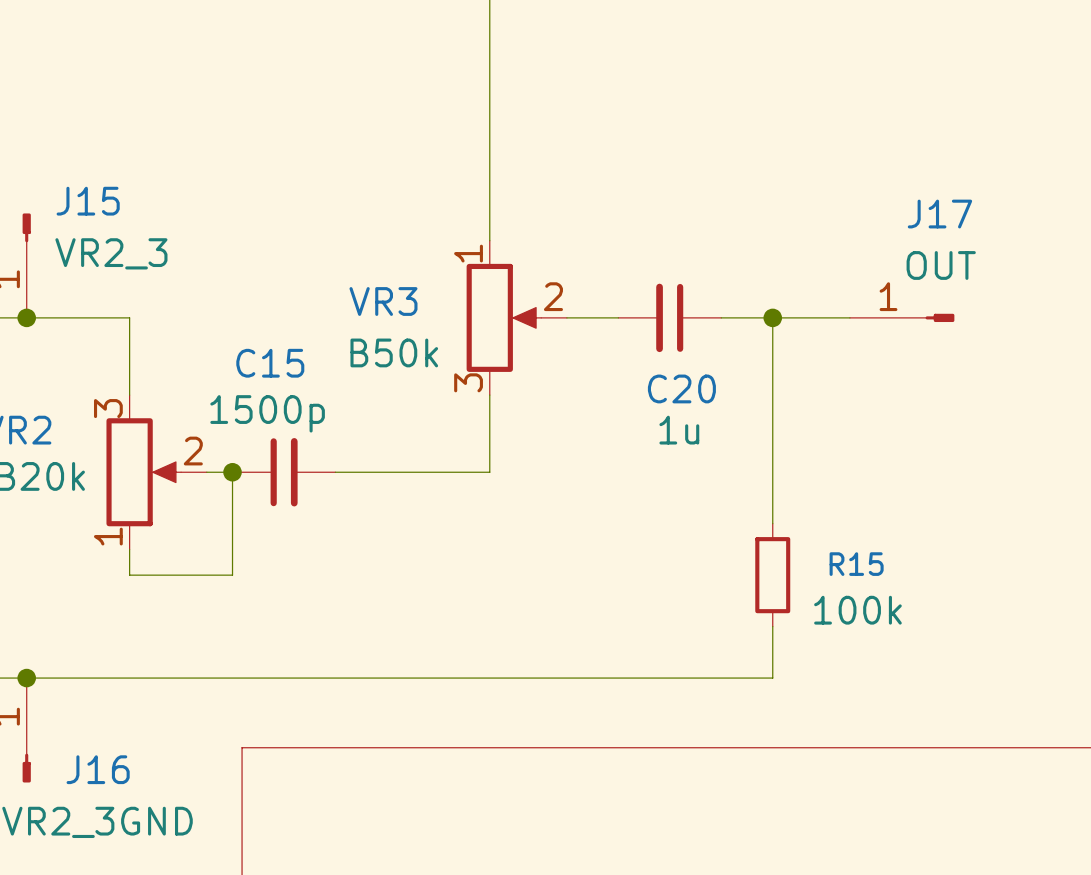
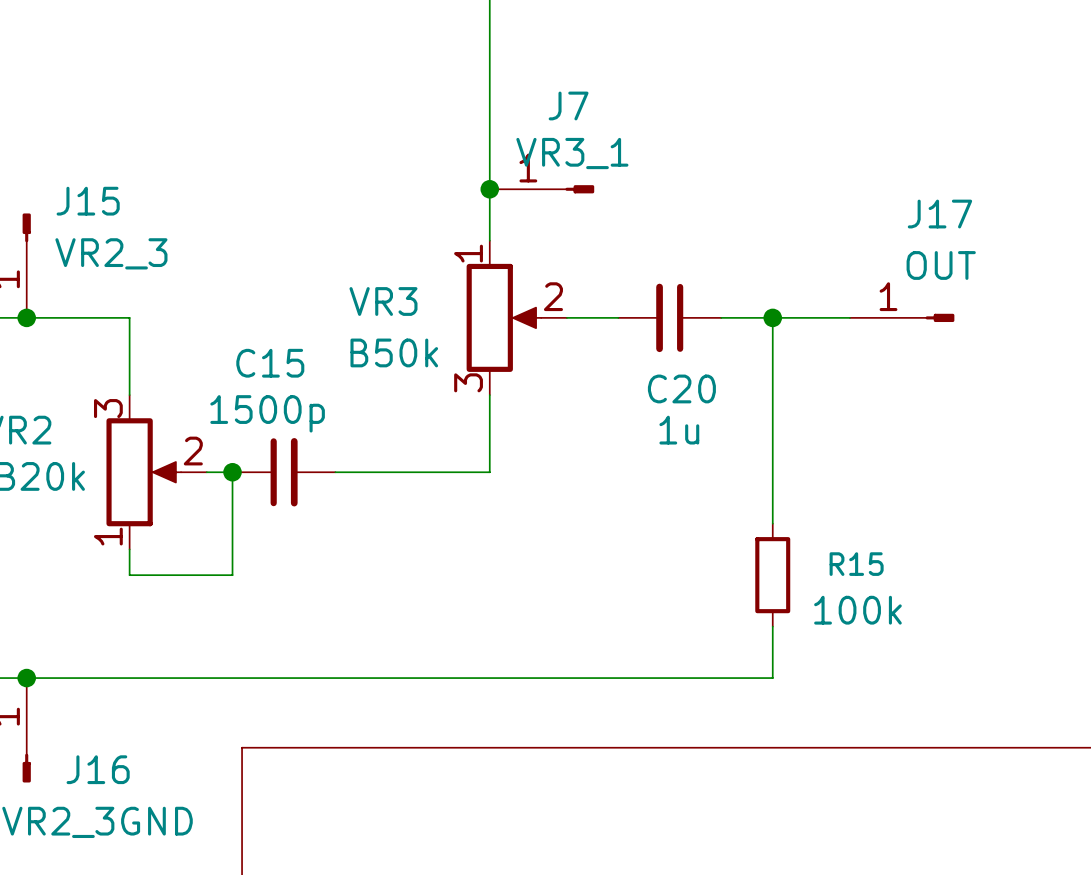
junction: none -> (489, 189)
J7: none -> VR3_1 (541, 189)

